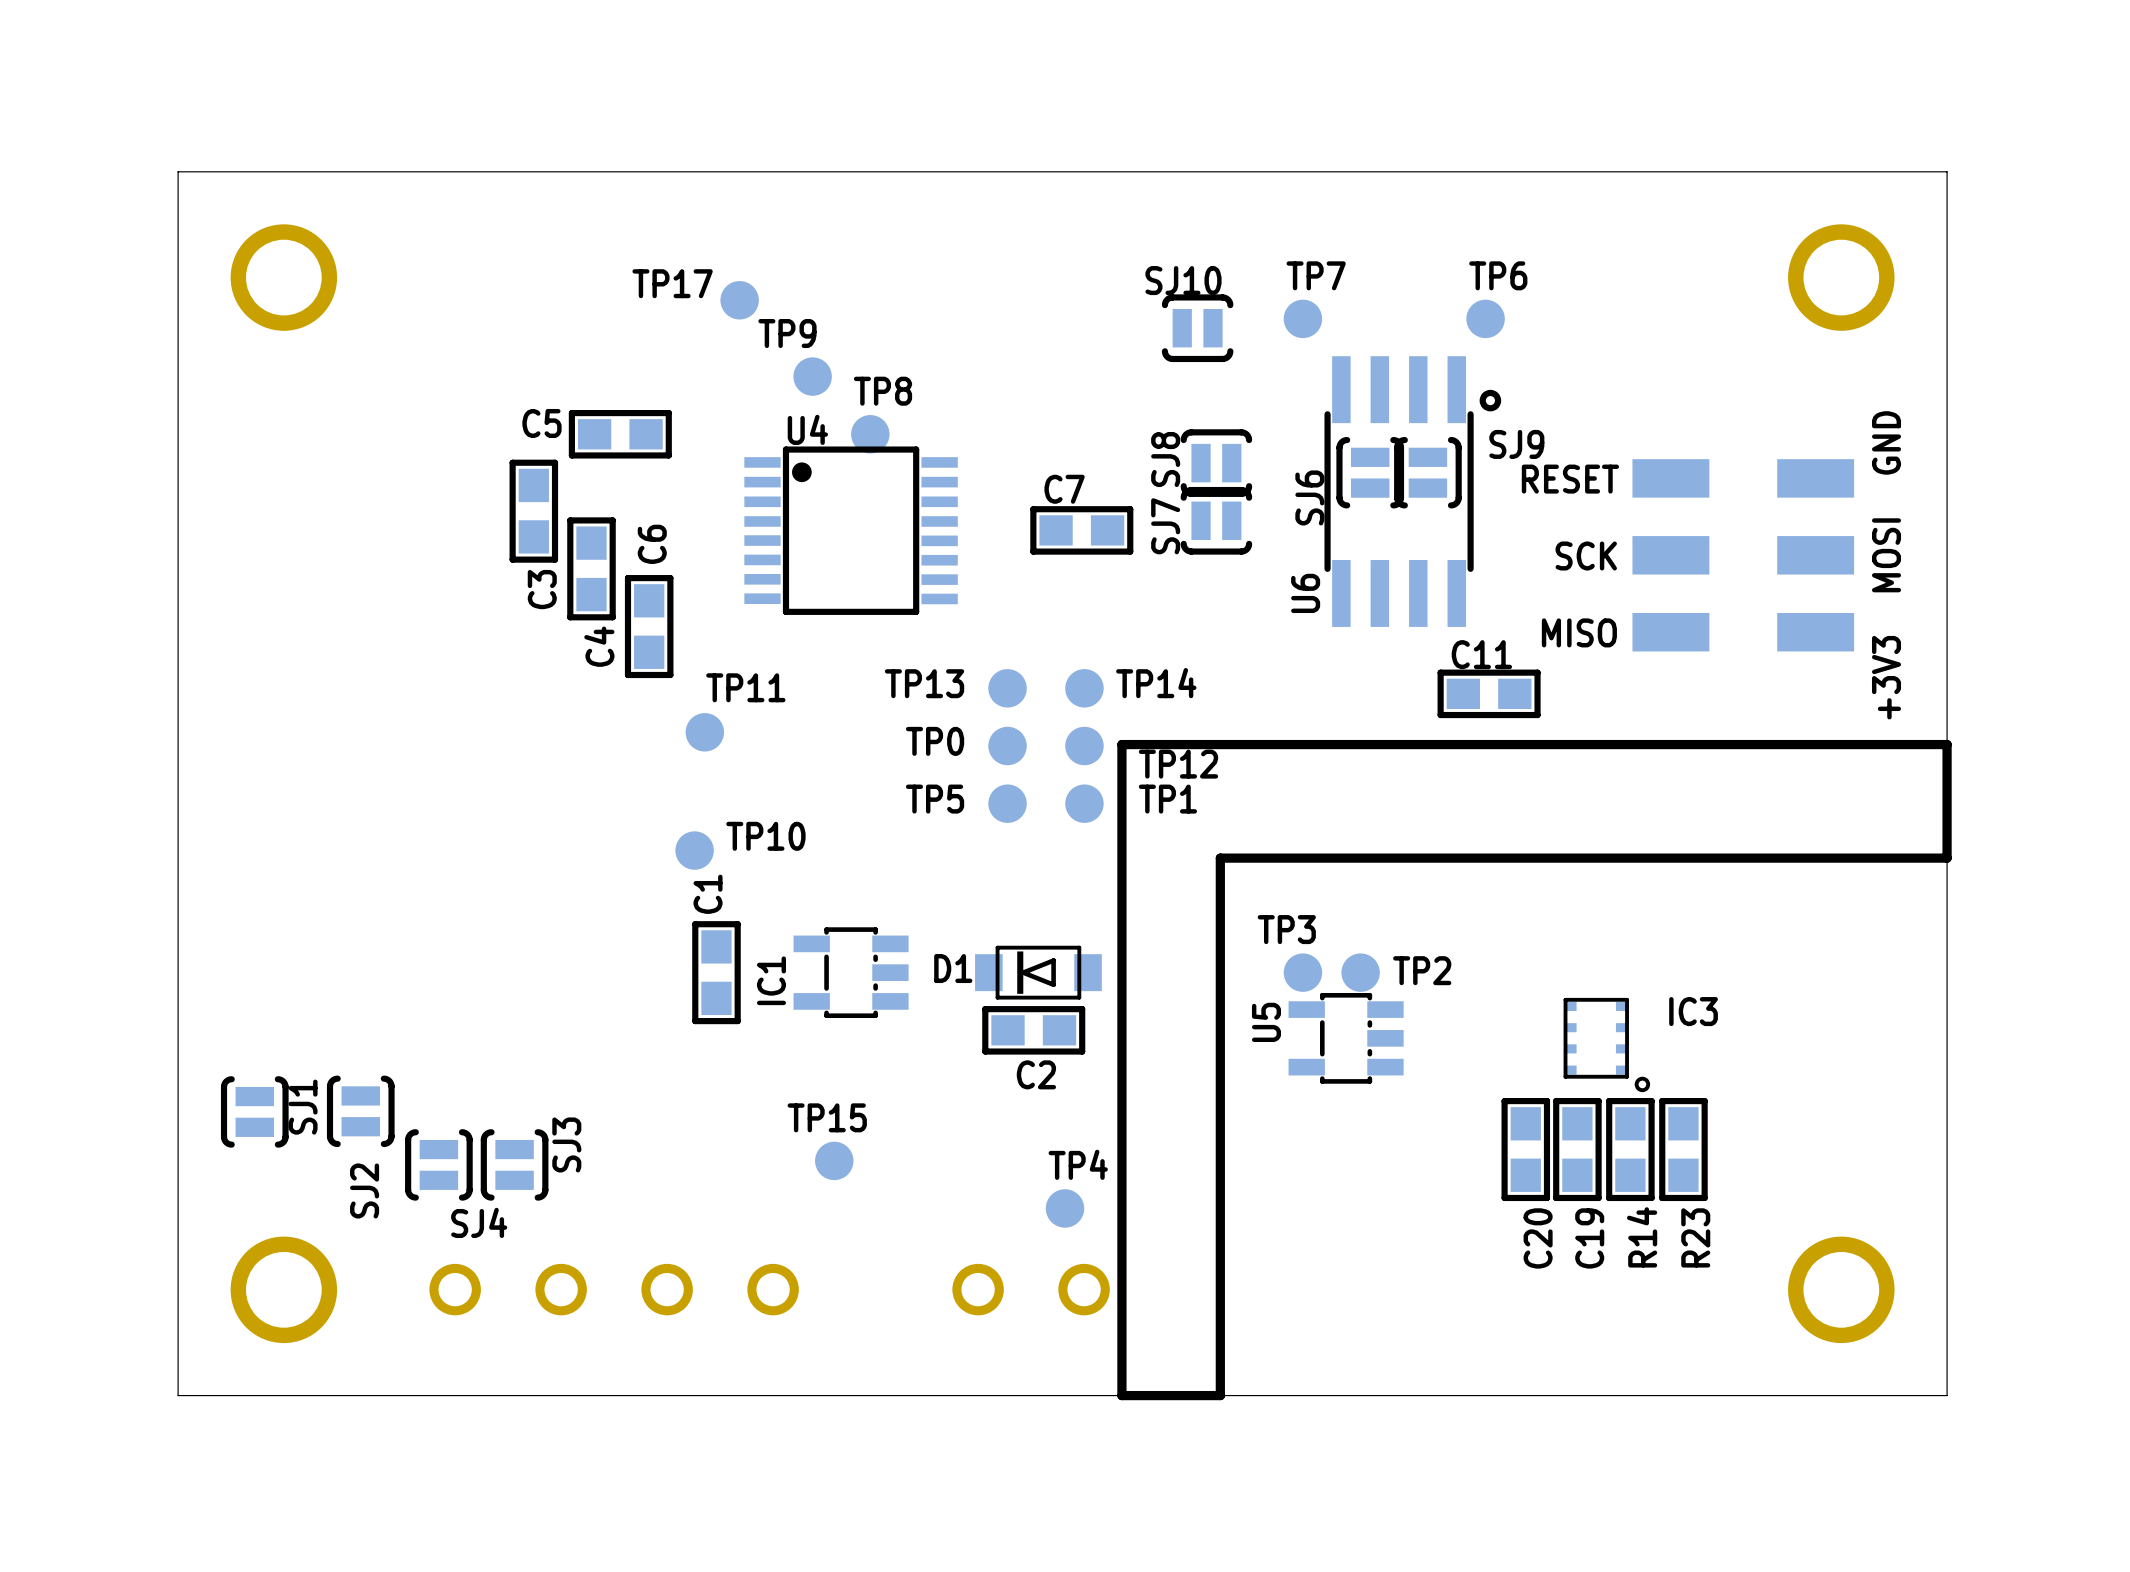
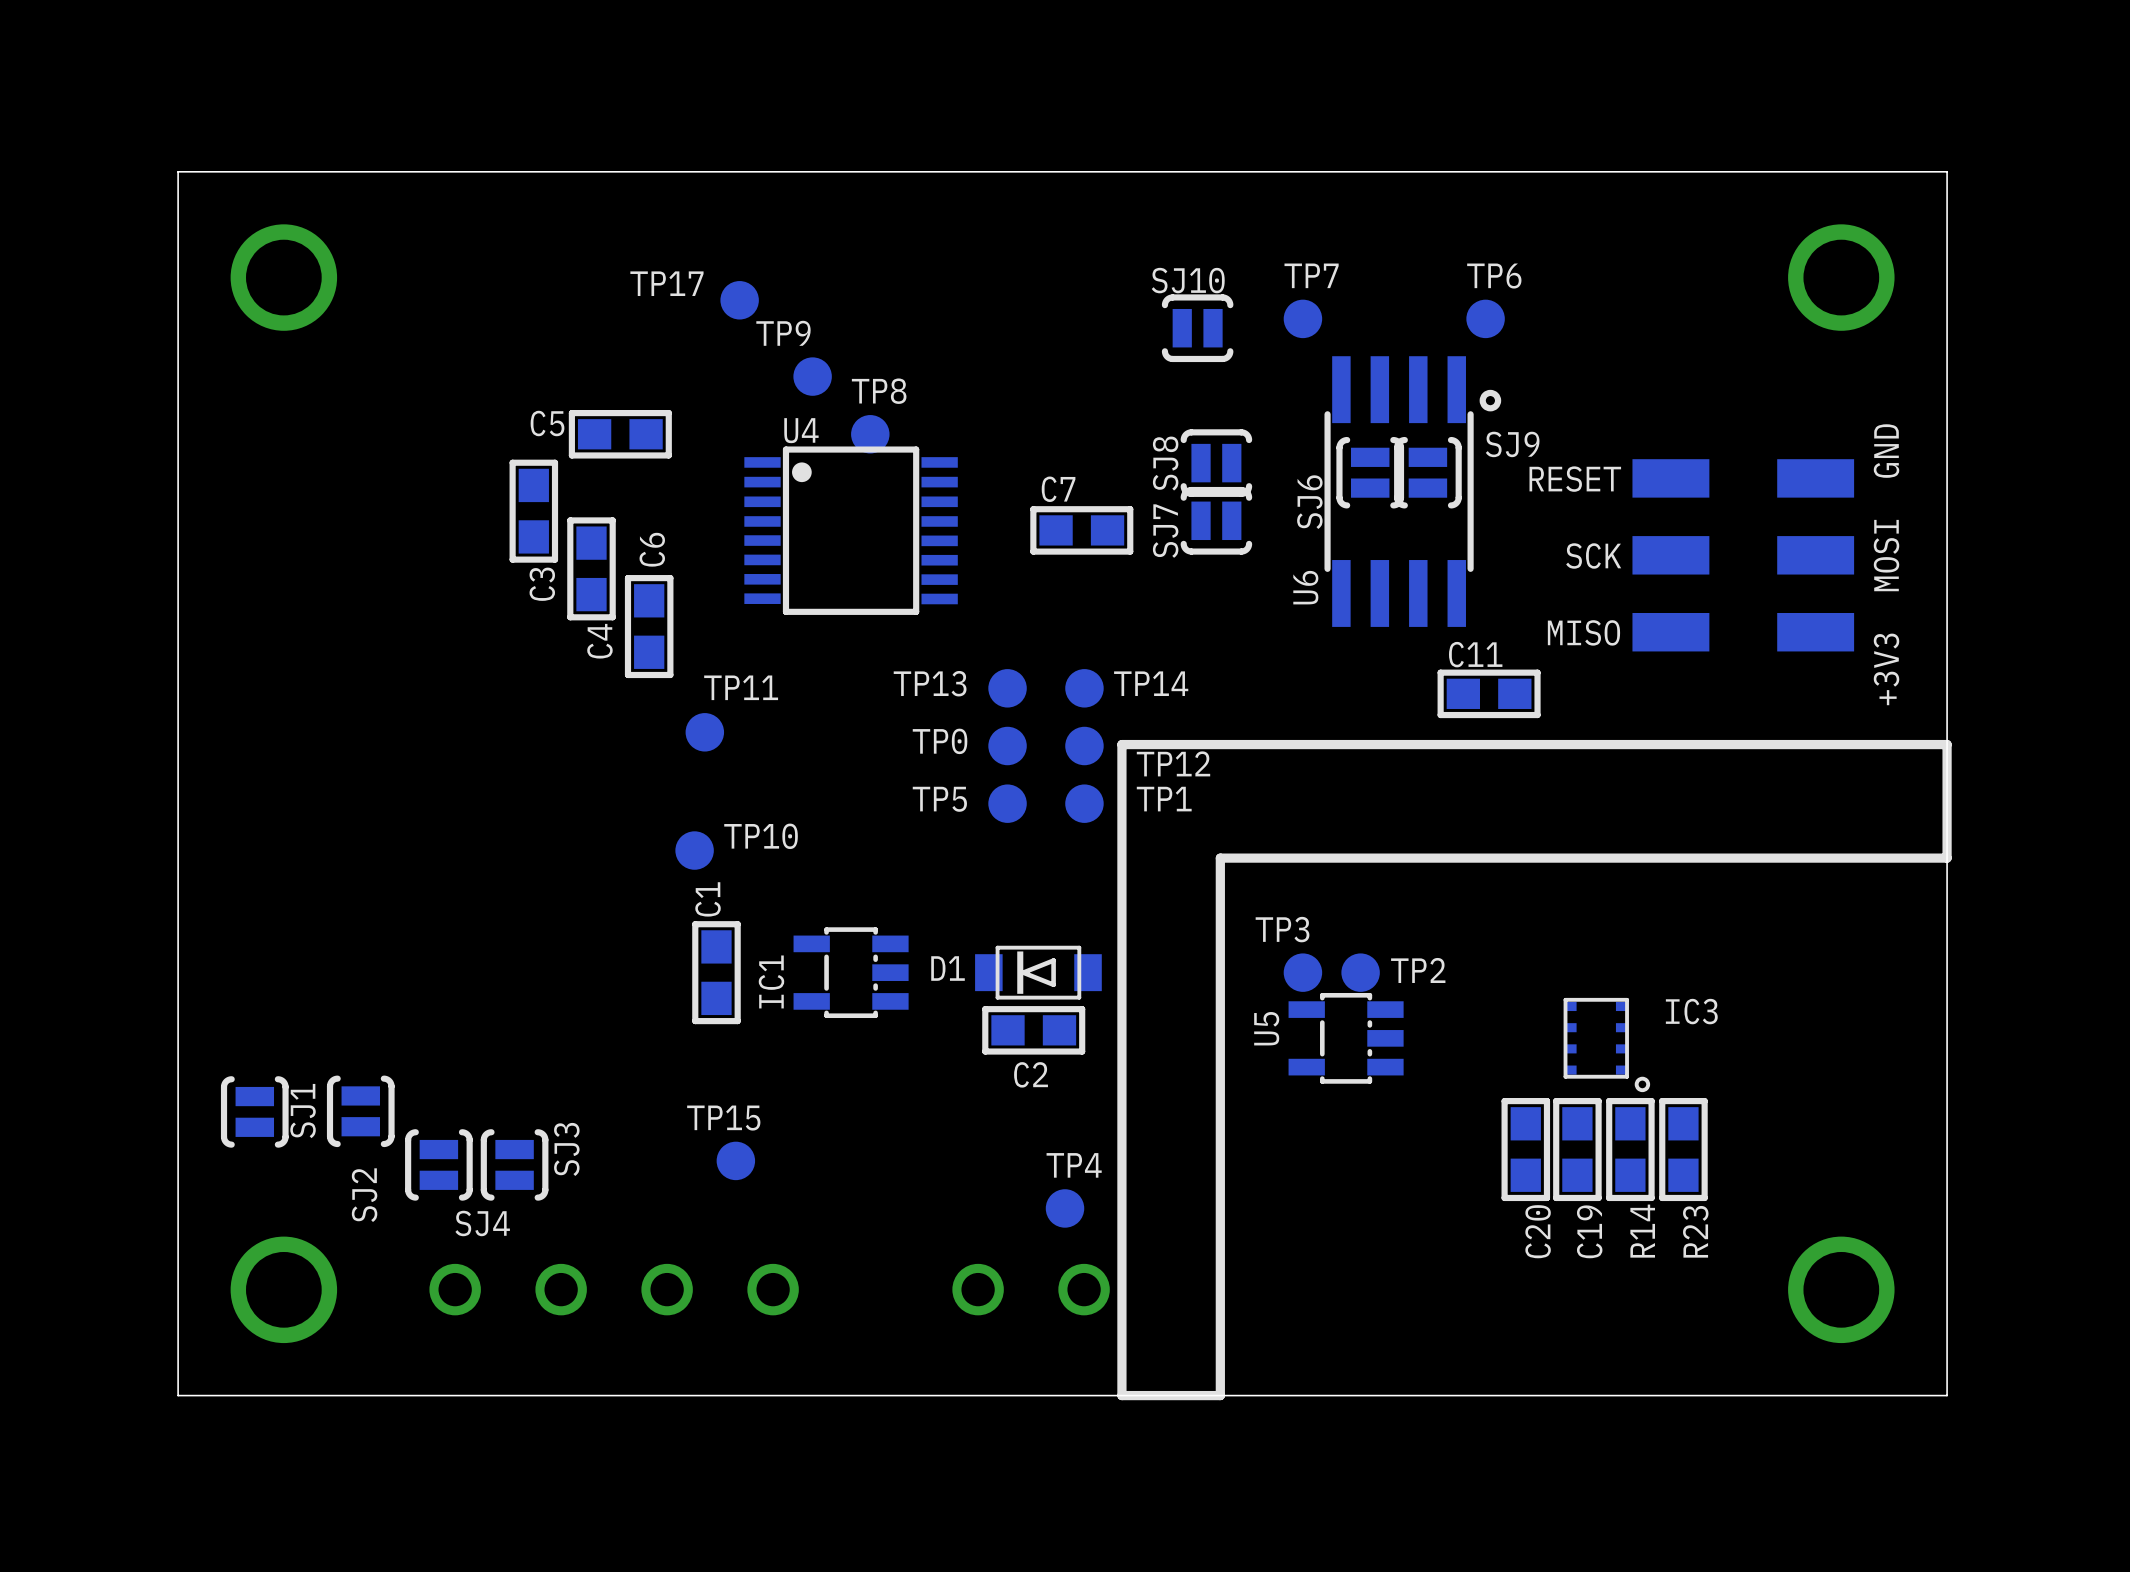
TP15 position: (834, 1160) -> (735, 1160)

